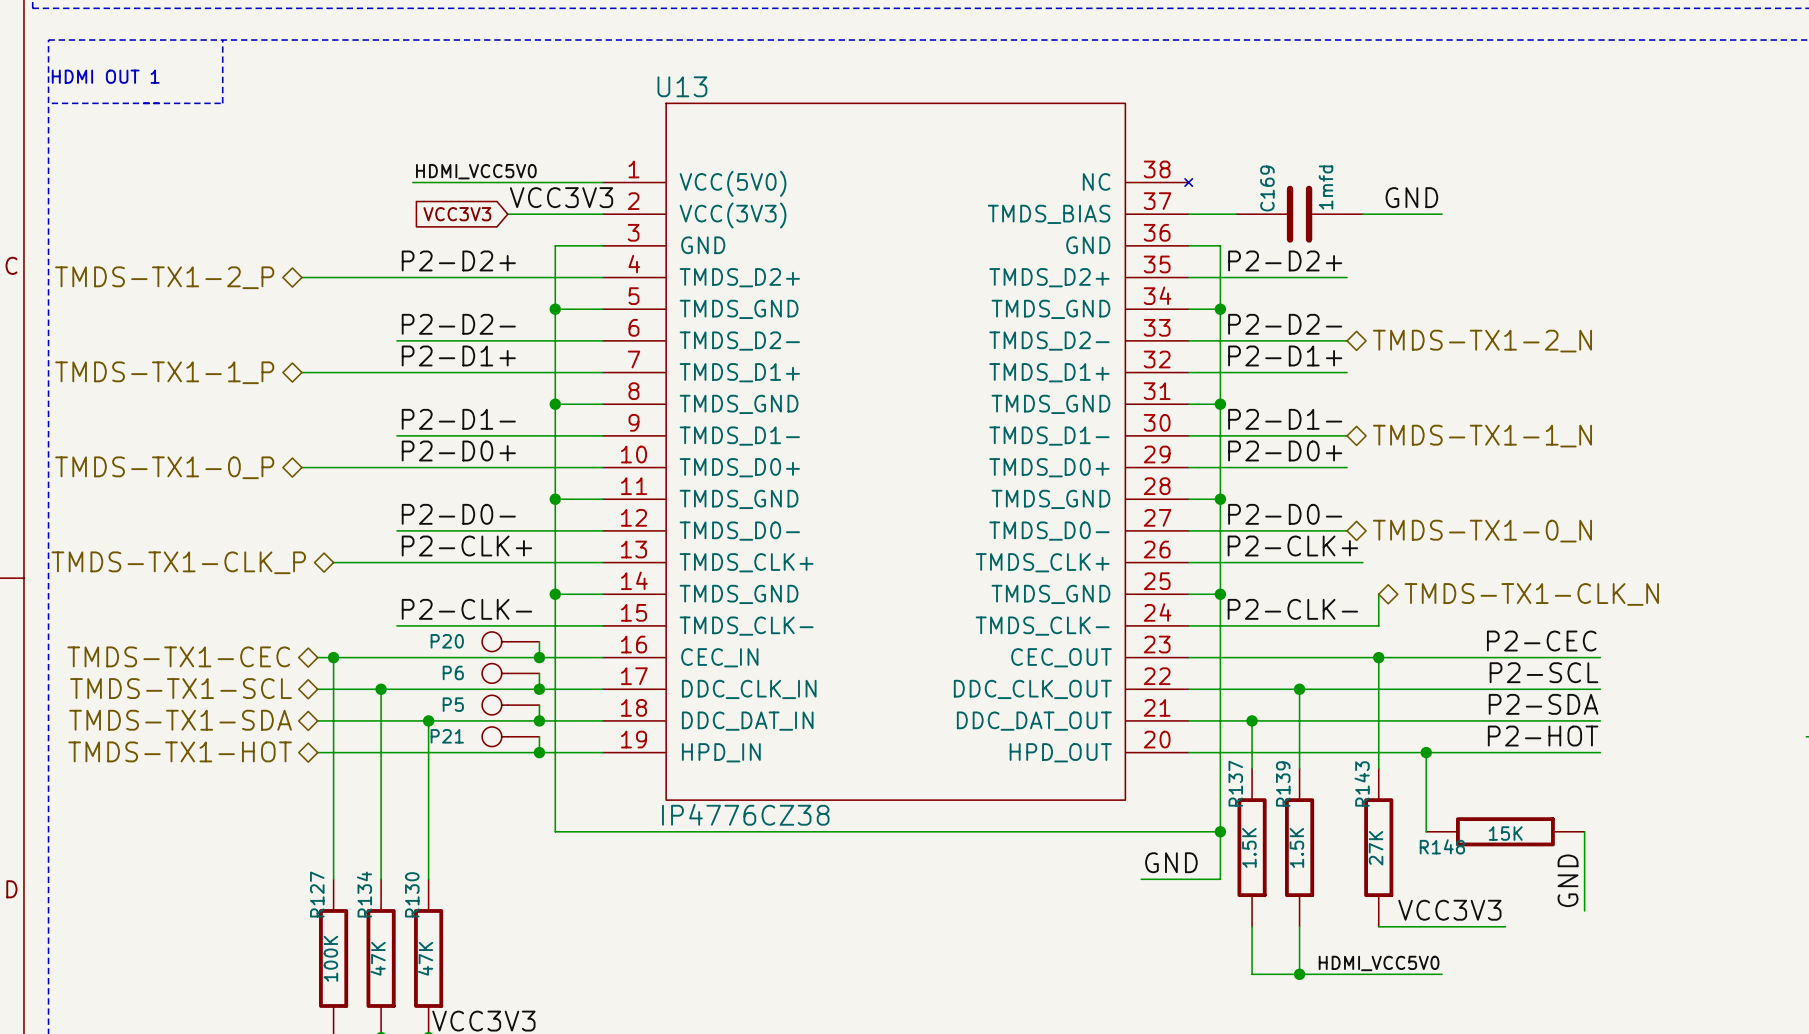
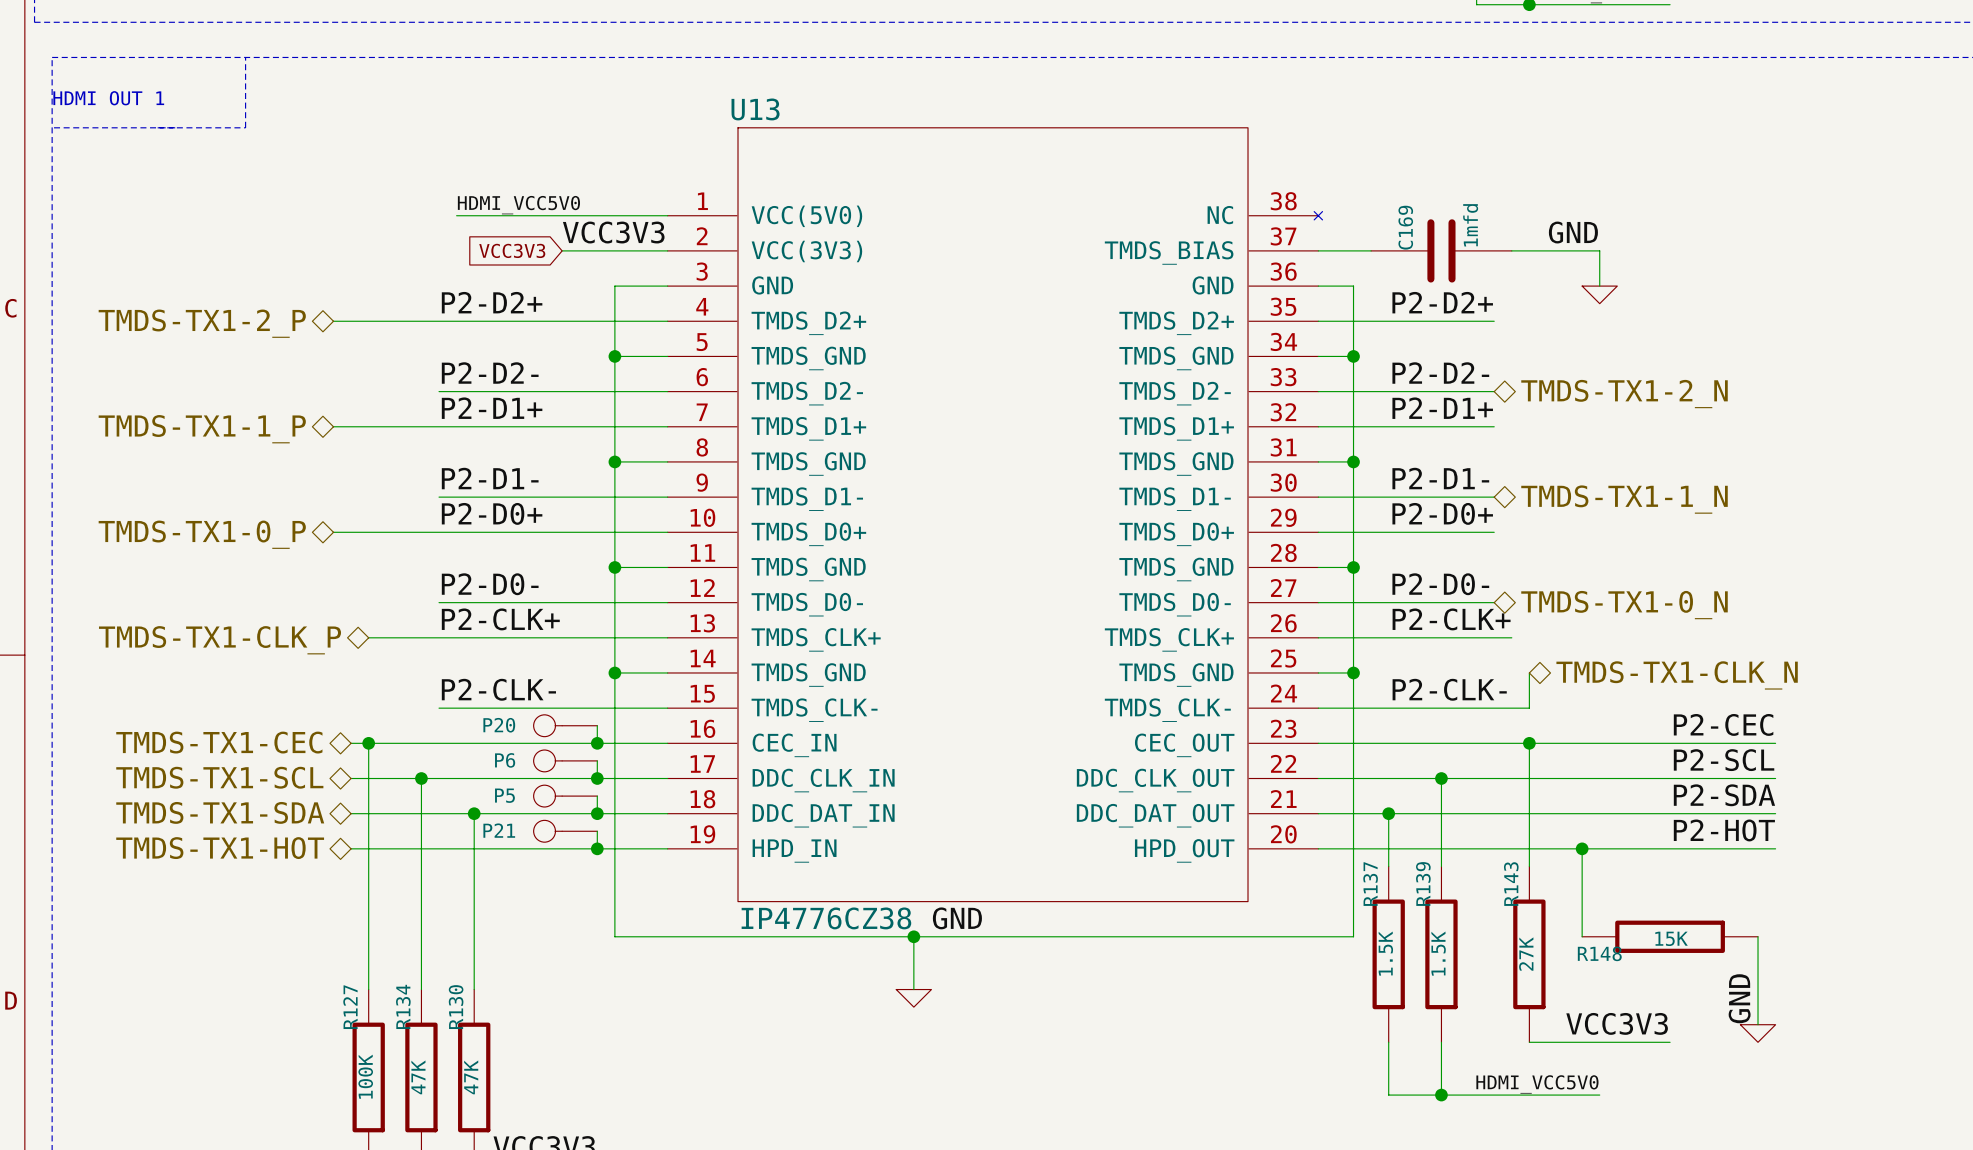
wire: none -> (1599, 250) (1599, 286)
power symbol: none -> (1599, 294)
wire: none -> (913, 936) (913, 989)
junction: none -> (913, 936)
wire: (1220, 831) (1220, 879) (1141, 879) -> none
junction: (1220, 831) -> none
label position: GND (1171, 862) -> GND (957, 918)
power symbol: none -> (913, 998)
power symbol: none -> (1758, 1033)

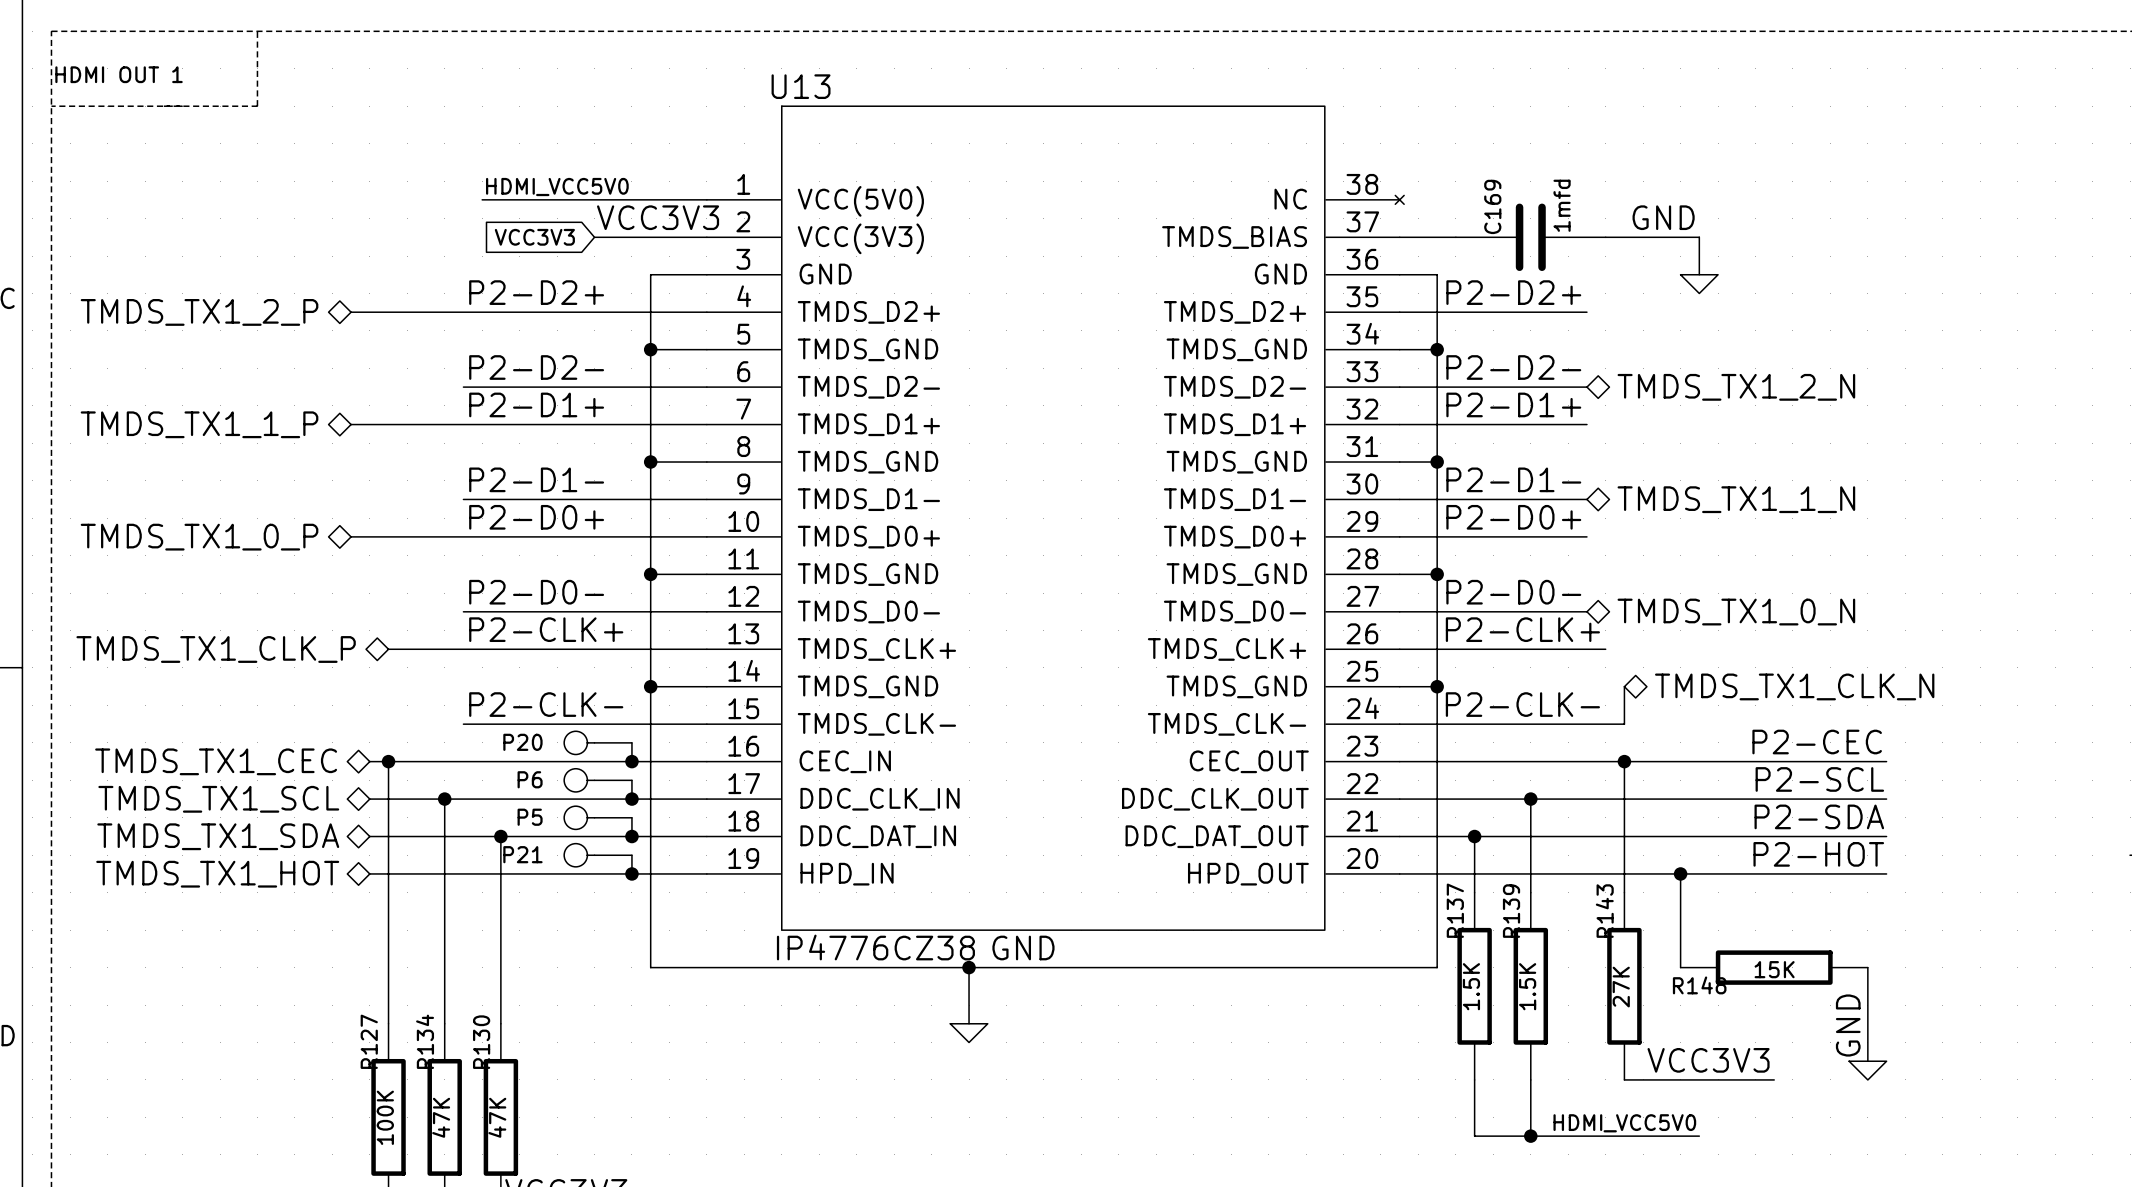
hierarchical label: TMDS-TX1-2_P (202, 323) -> TMDS_TX1_2_P (199, 312)
hierarchical label: TMDS-TX1-2_N (1624, 394) -> TMDS_TX1_2_N (1736, 387)
hierarchical label: TMDS-TX1-1_P (202, 429) -> TMDS_TX1_1_P (199, 424)
hierarchical label: TMDS-TX1-1_N (1624, 499) -> TMDS_TX1_1_N (1736, 499)
hierarchical label: TMDS-TX1-0_P (202, 534) -> TMDS_TX1_0_P (199, 537)
hierarchical label: TMDS-TX1-0_N (1624, 605) -> TMDS_TX1_0_N (1736, 612)
hierarchical label: TMDS-TX1-CLK_P (220, 640) -> TMDS_TX1_CLK_P (216, 649)
hierarchical label: TMDS-TX1-CLK_N (1677, 675) -> TMDS_TX1_CLK_N (1794, 686)
hierarchical label: TMDS-TX1-CEC (219, 742) -> TMDS_TX1_CEC (216, 761)
hierarchical label: TMDS-TX1-SCL (219, 777) -> TMDS_TX1_SCL (218, 799)
hierarchical label: TMDS-TX1-SDA (220, 812) -> TMDS_TX1_SDA (218, 836)
hierarchical label: TMDS-TX1-HOT (220, 848) -> TMDS_TX1_HOT (217, 874)

